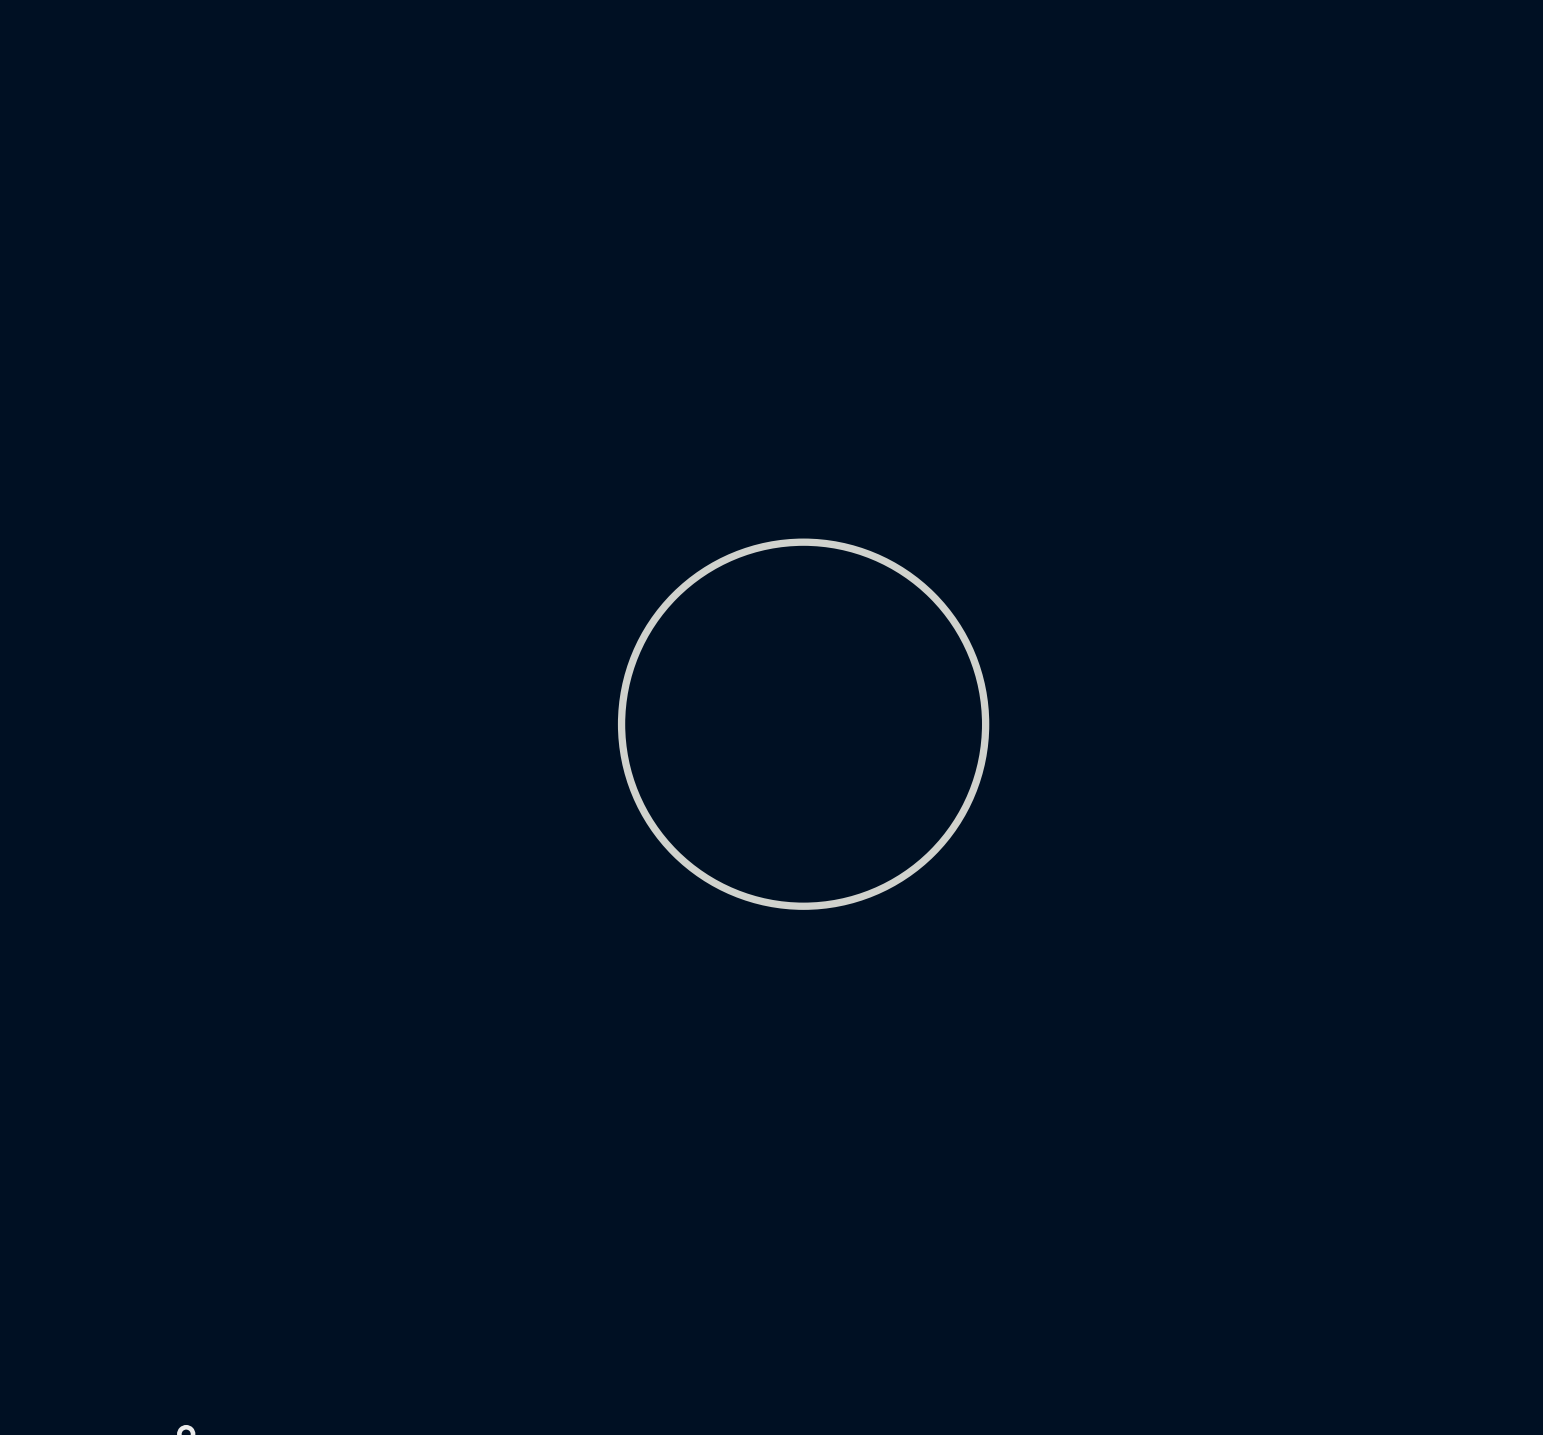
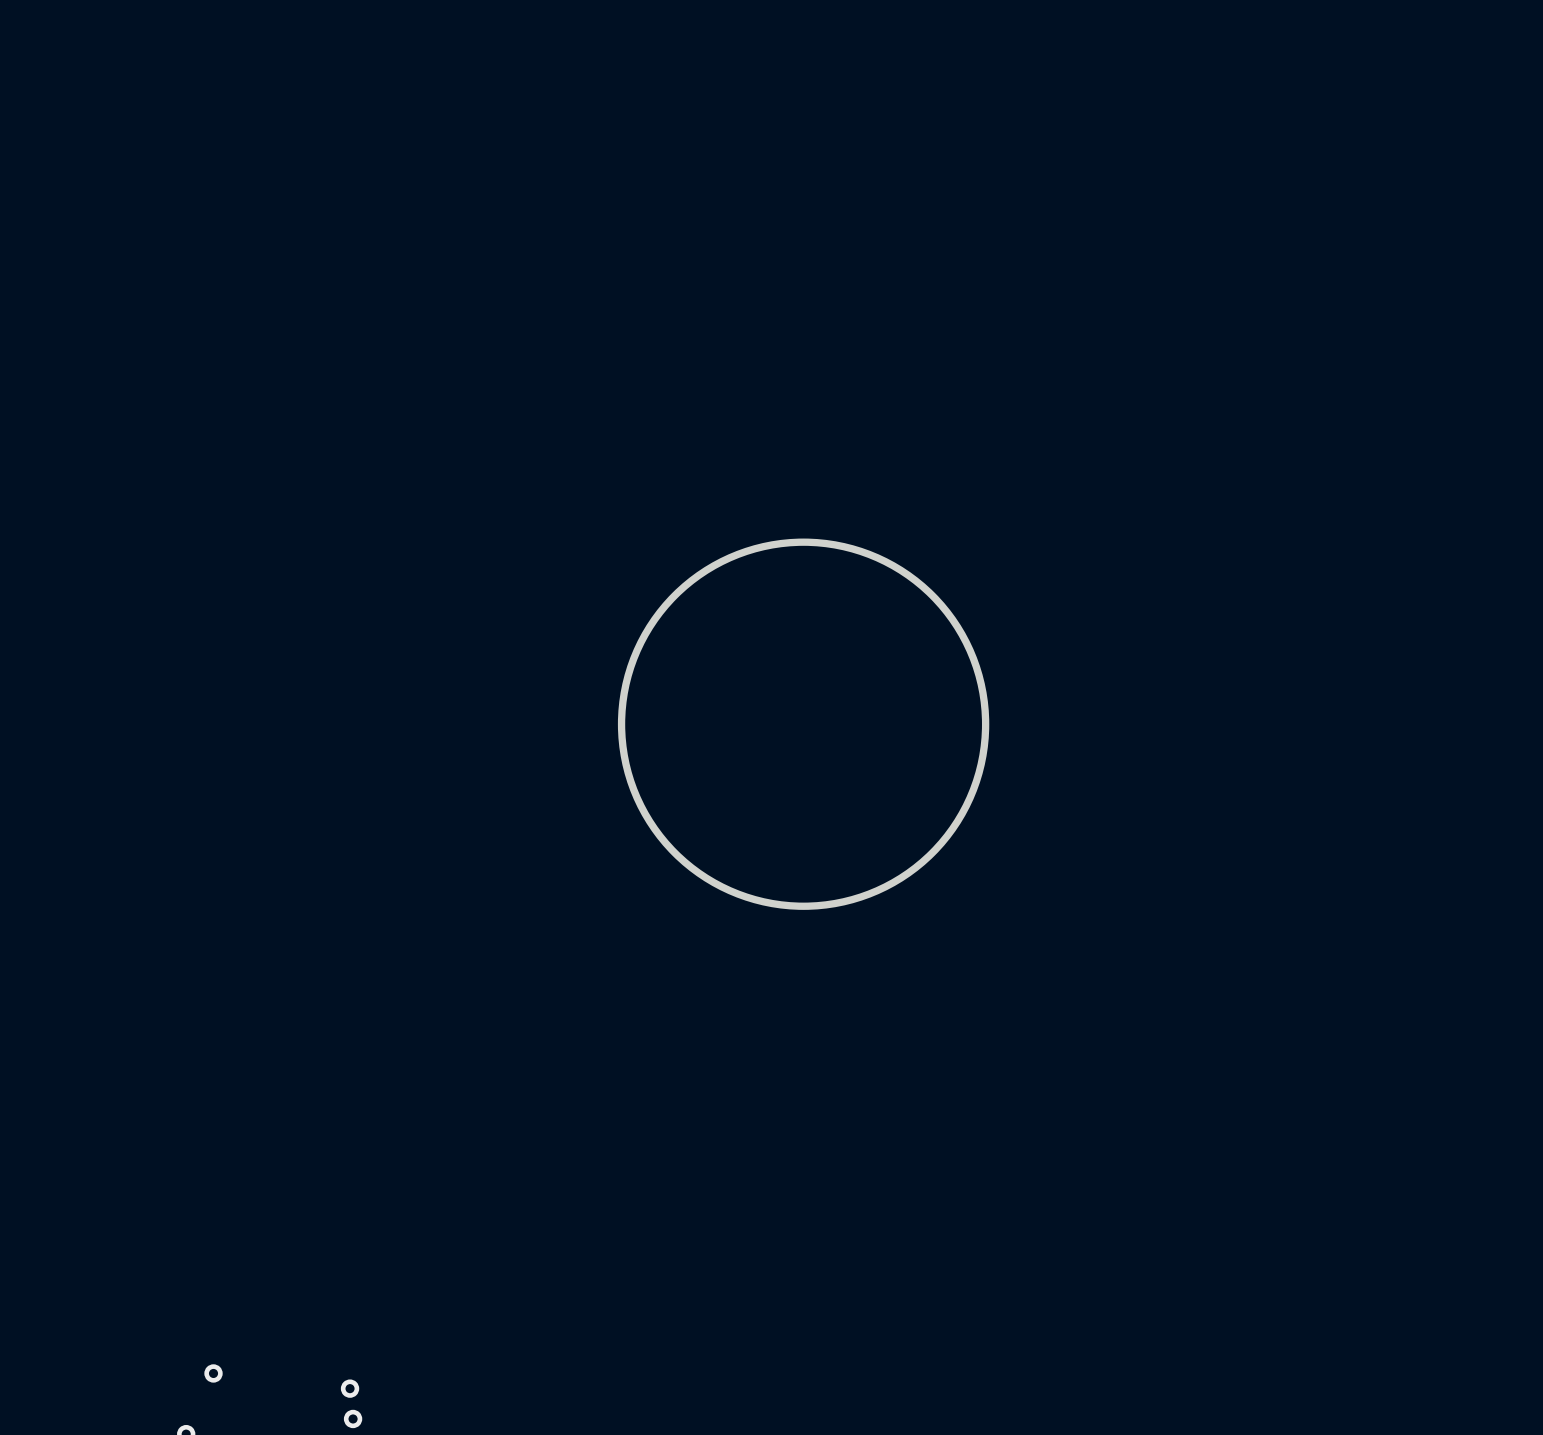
via: none -> (213, 1373)
via: none -> (350, 1388)
via: none -> (353, 1418)

